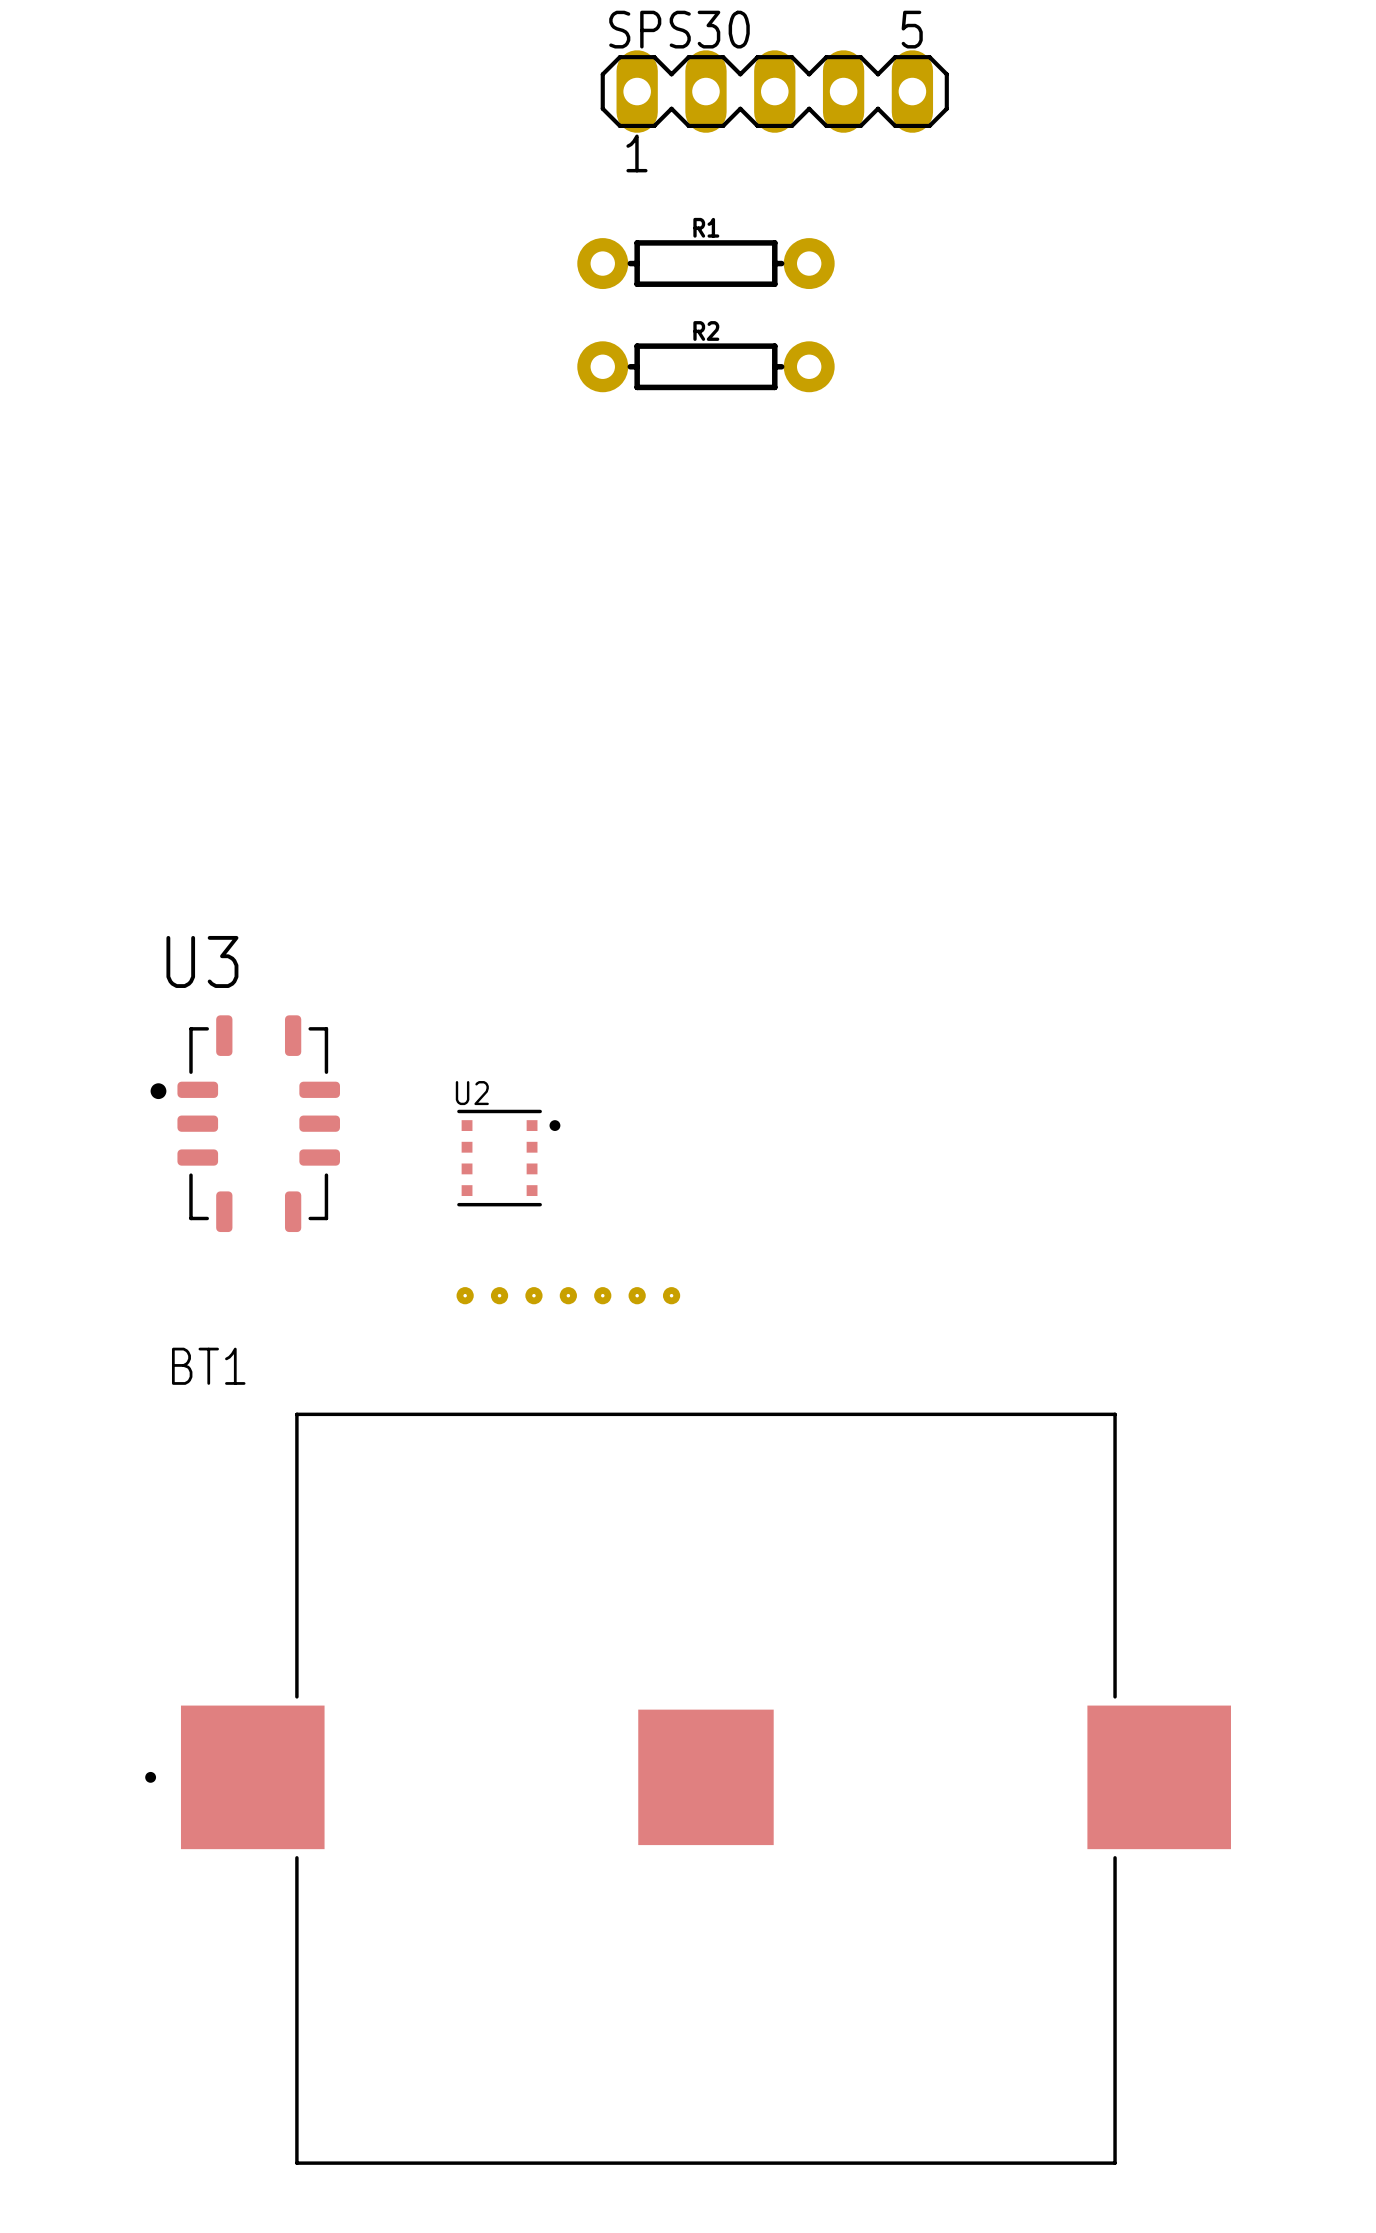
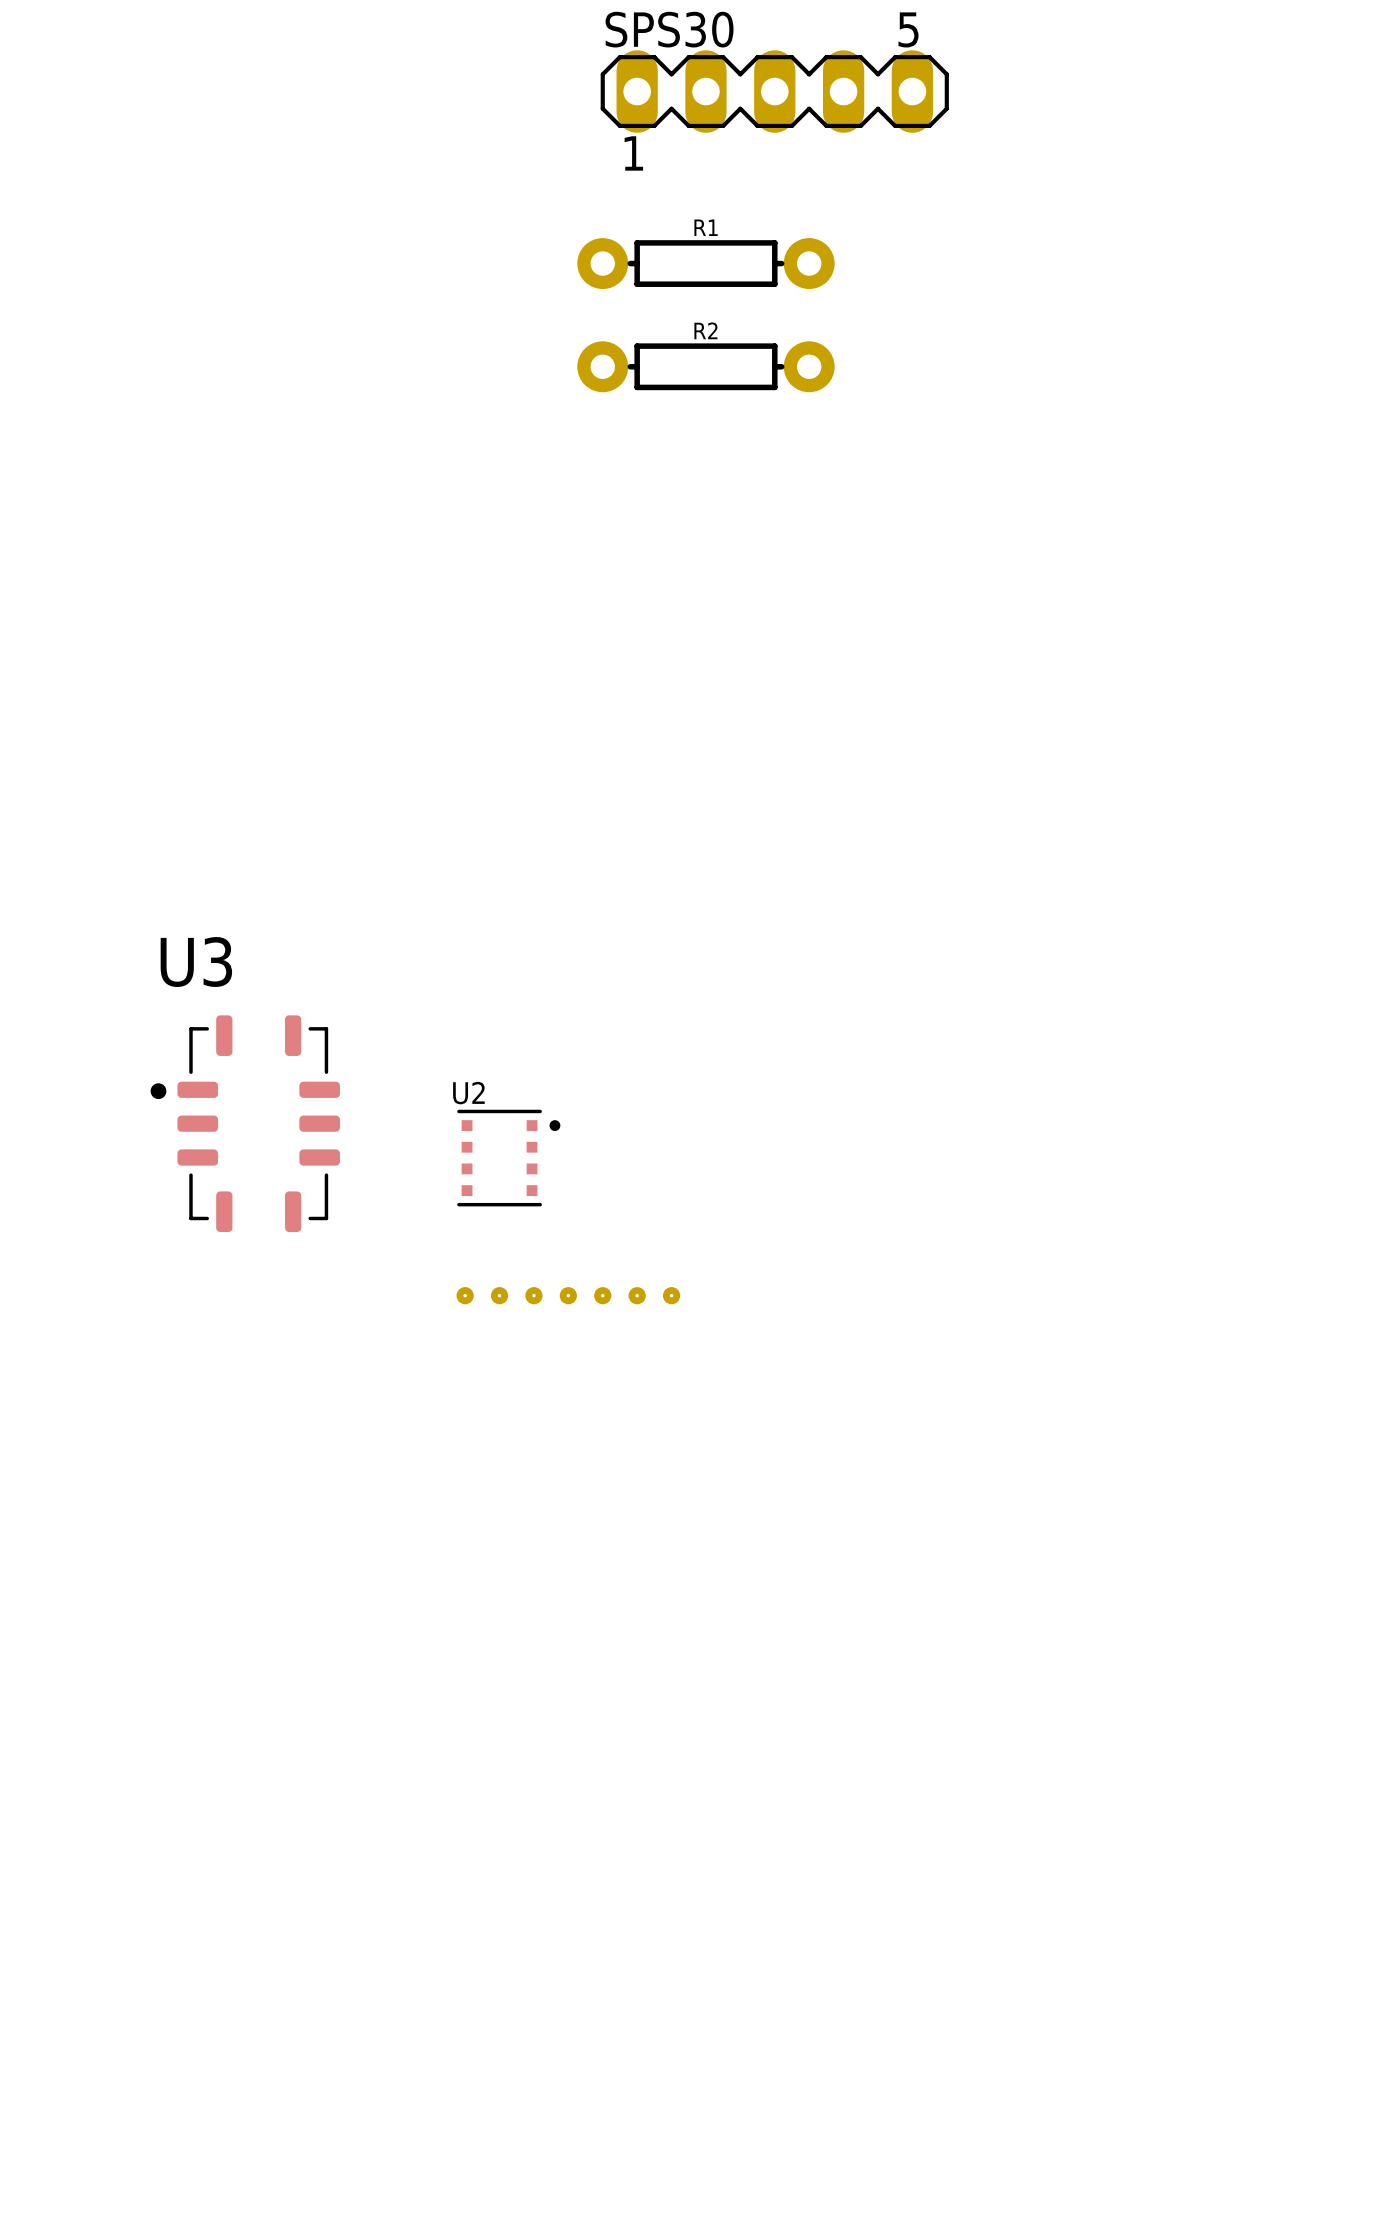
BT1: (688, 1788) -> none

